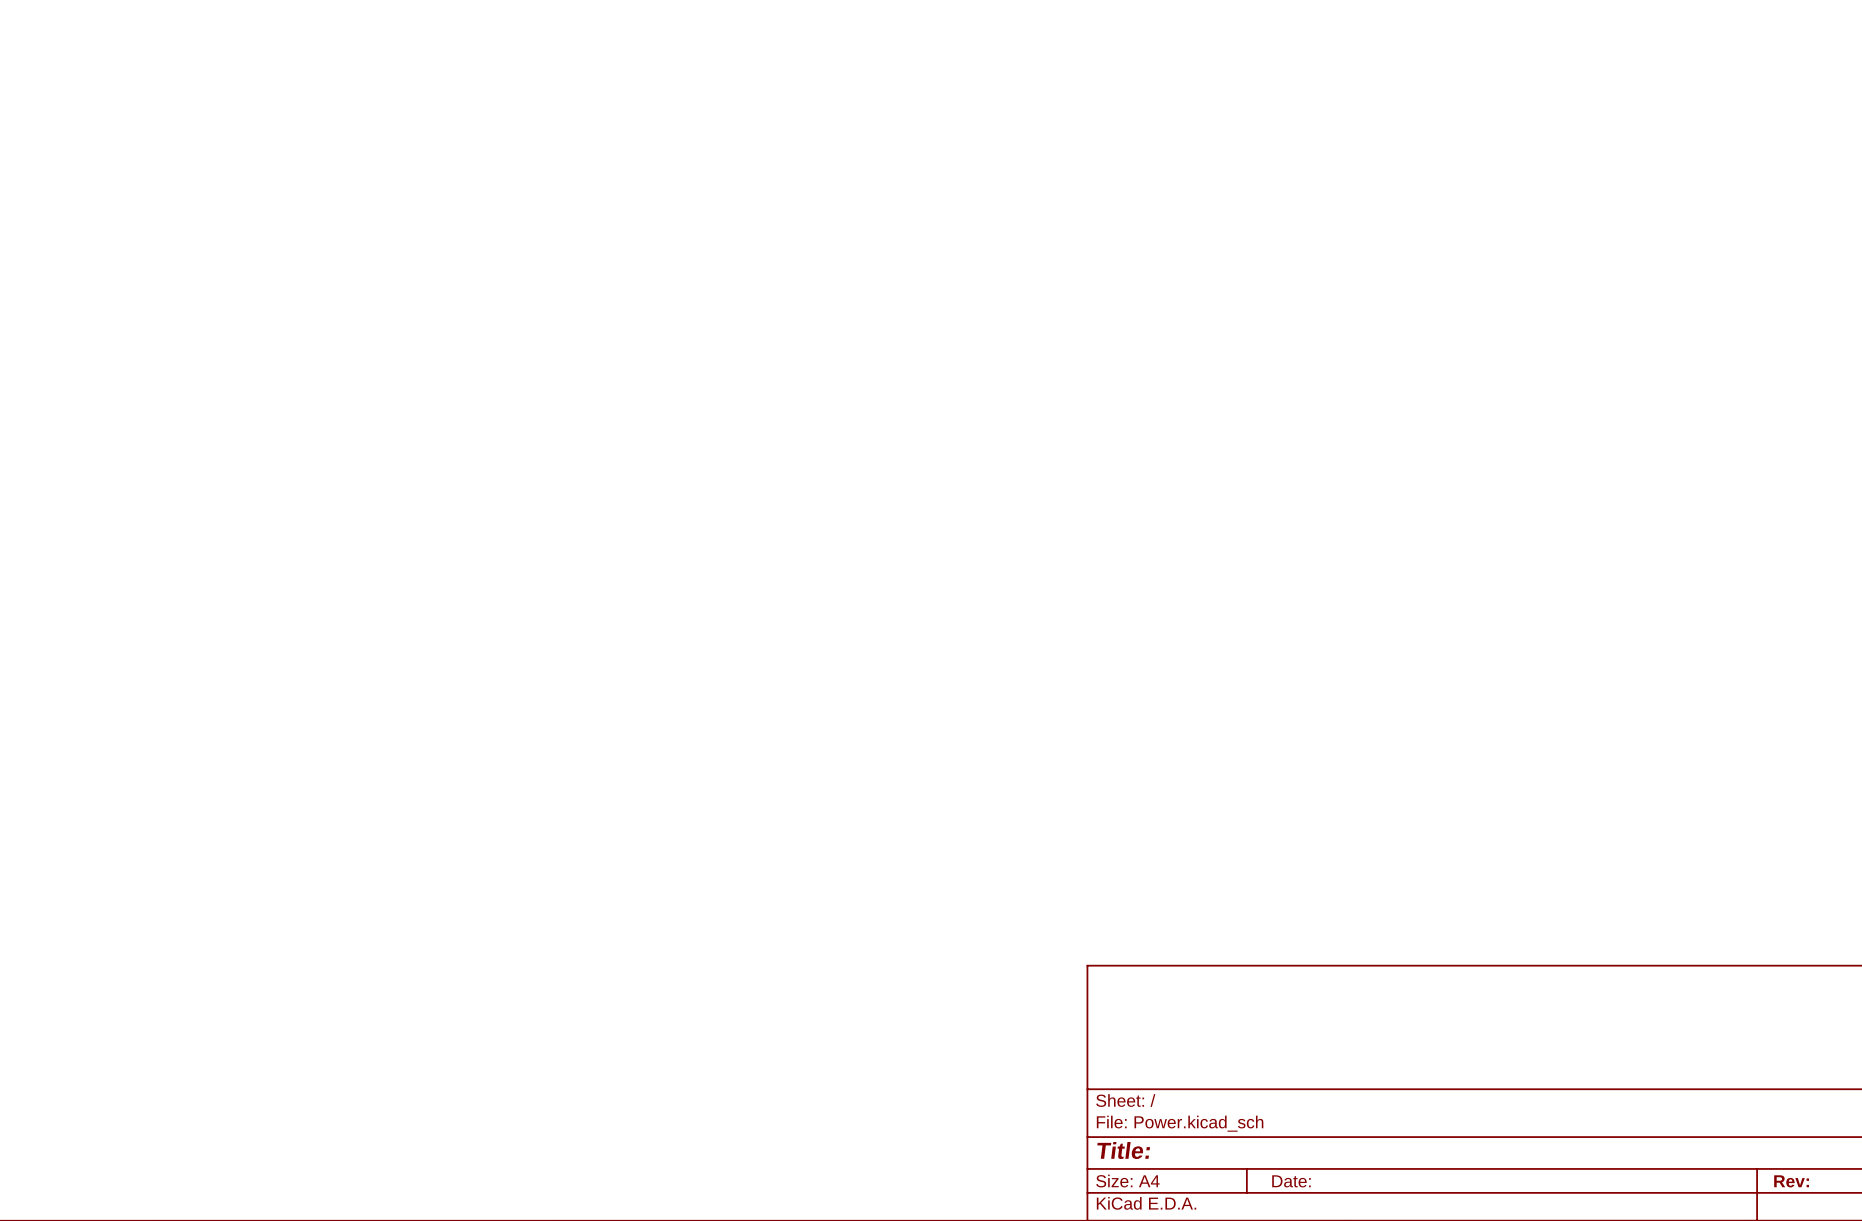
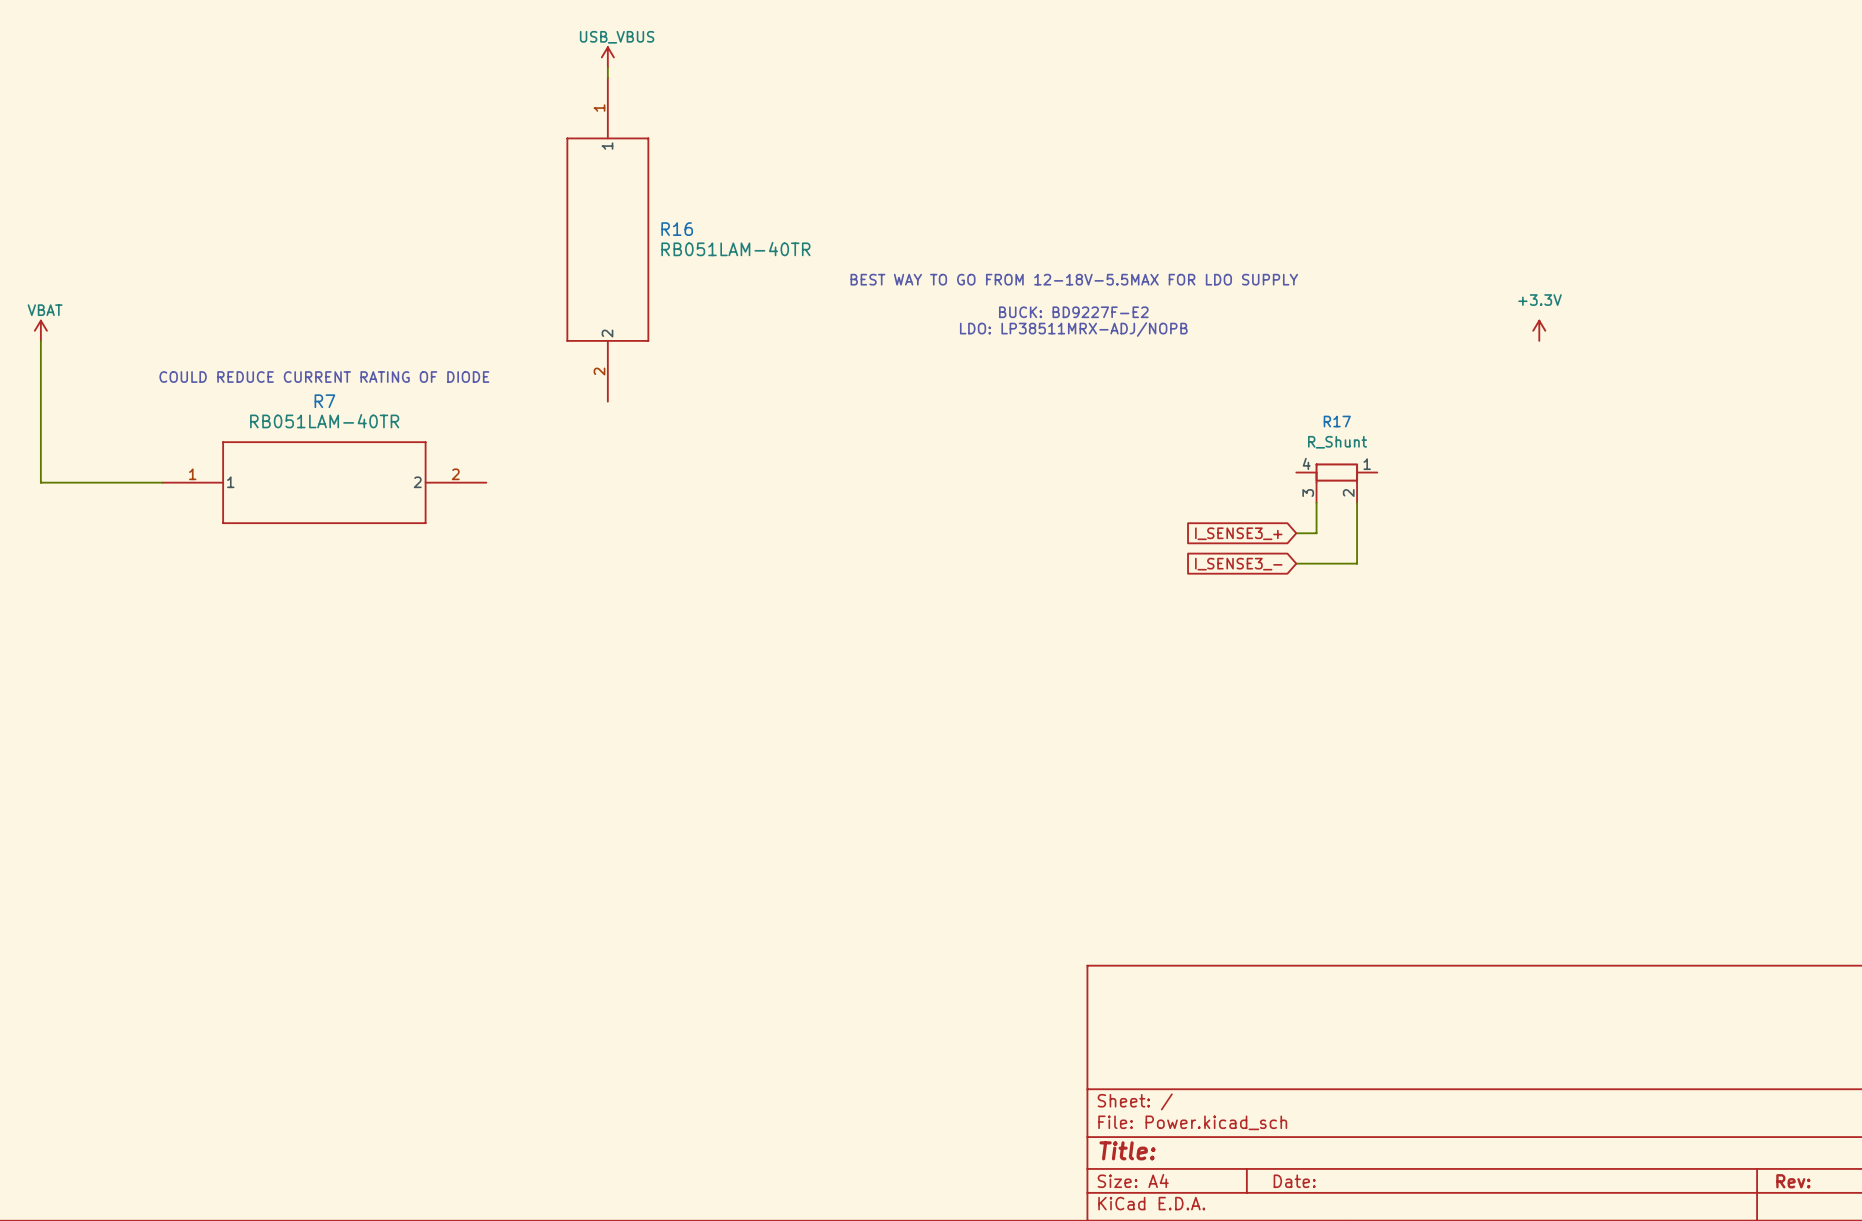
power symbol: none -> USB_VBUS (607, 57)
wire: none -> (607, 67) (607, 77)
R16: none -> RB051LAM-40TR (607, 239)
text: none -> BEST WAY TO GO FROM 12-18V-5.5MAX FOR LDO SUPPLY (1074, 279)
text: none -> BUCK: BD9227F-E2 (1073, 312)
text: none -> LDO: LP38511MRX-ADJ/NOPB (1073, 329)
power symbol: none -> VBAT (40, 330)
power symbol: none -> +3.3V (1539, 330)
wire: none -> (40, 340) (40, 482) (162, 482)
text: none -> COULD REDUCE CURRENT RATING OF DIODE (324, 377)
R7: none -> RB051LAM-40TR (324, 482)
R17: none -> R_Shunt (1336, 483)
wire: none -> (1316, 502) (1316, 533) (1296, 533)
wire: none -> (1357, 502) (1357, 563) (1296, 563)
global label: none -> I_SENSE3_+ (1238, 533)
global label: none -> I_SENSE3_- (1238, 564)

